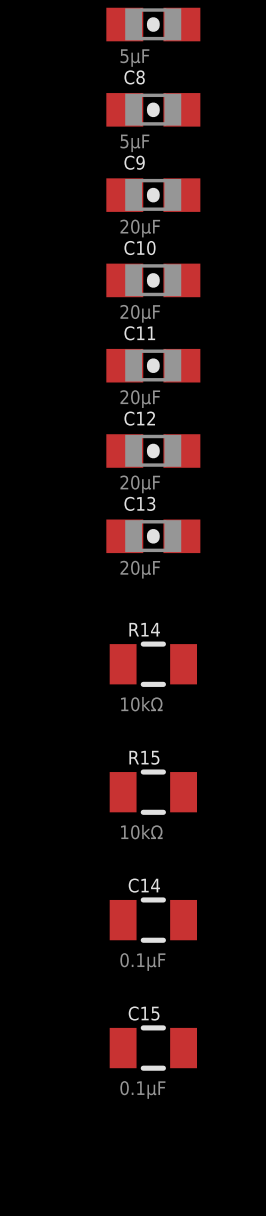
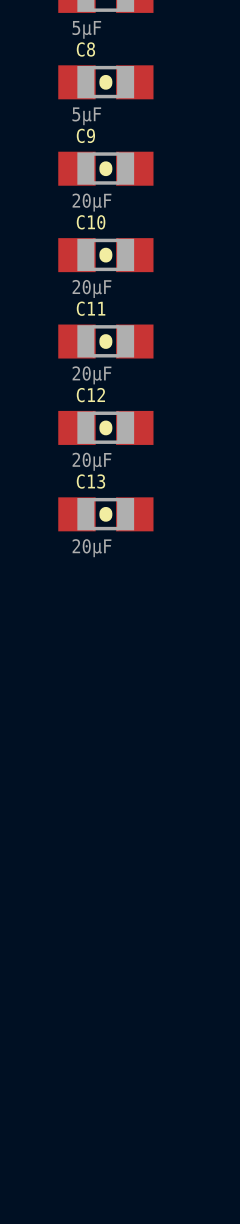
R14: 10kΩ (153, 664) -> none
R15: 10kΩ (153, 792) -> none
C14: 0.1µF (153, 920) -> none
C15: 0.1µF (153, 1048) -> none

